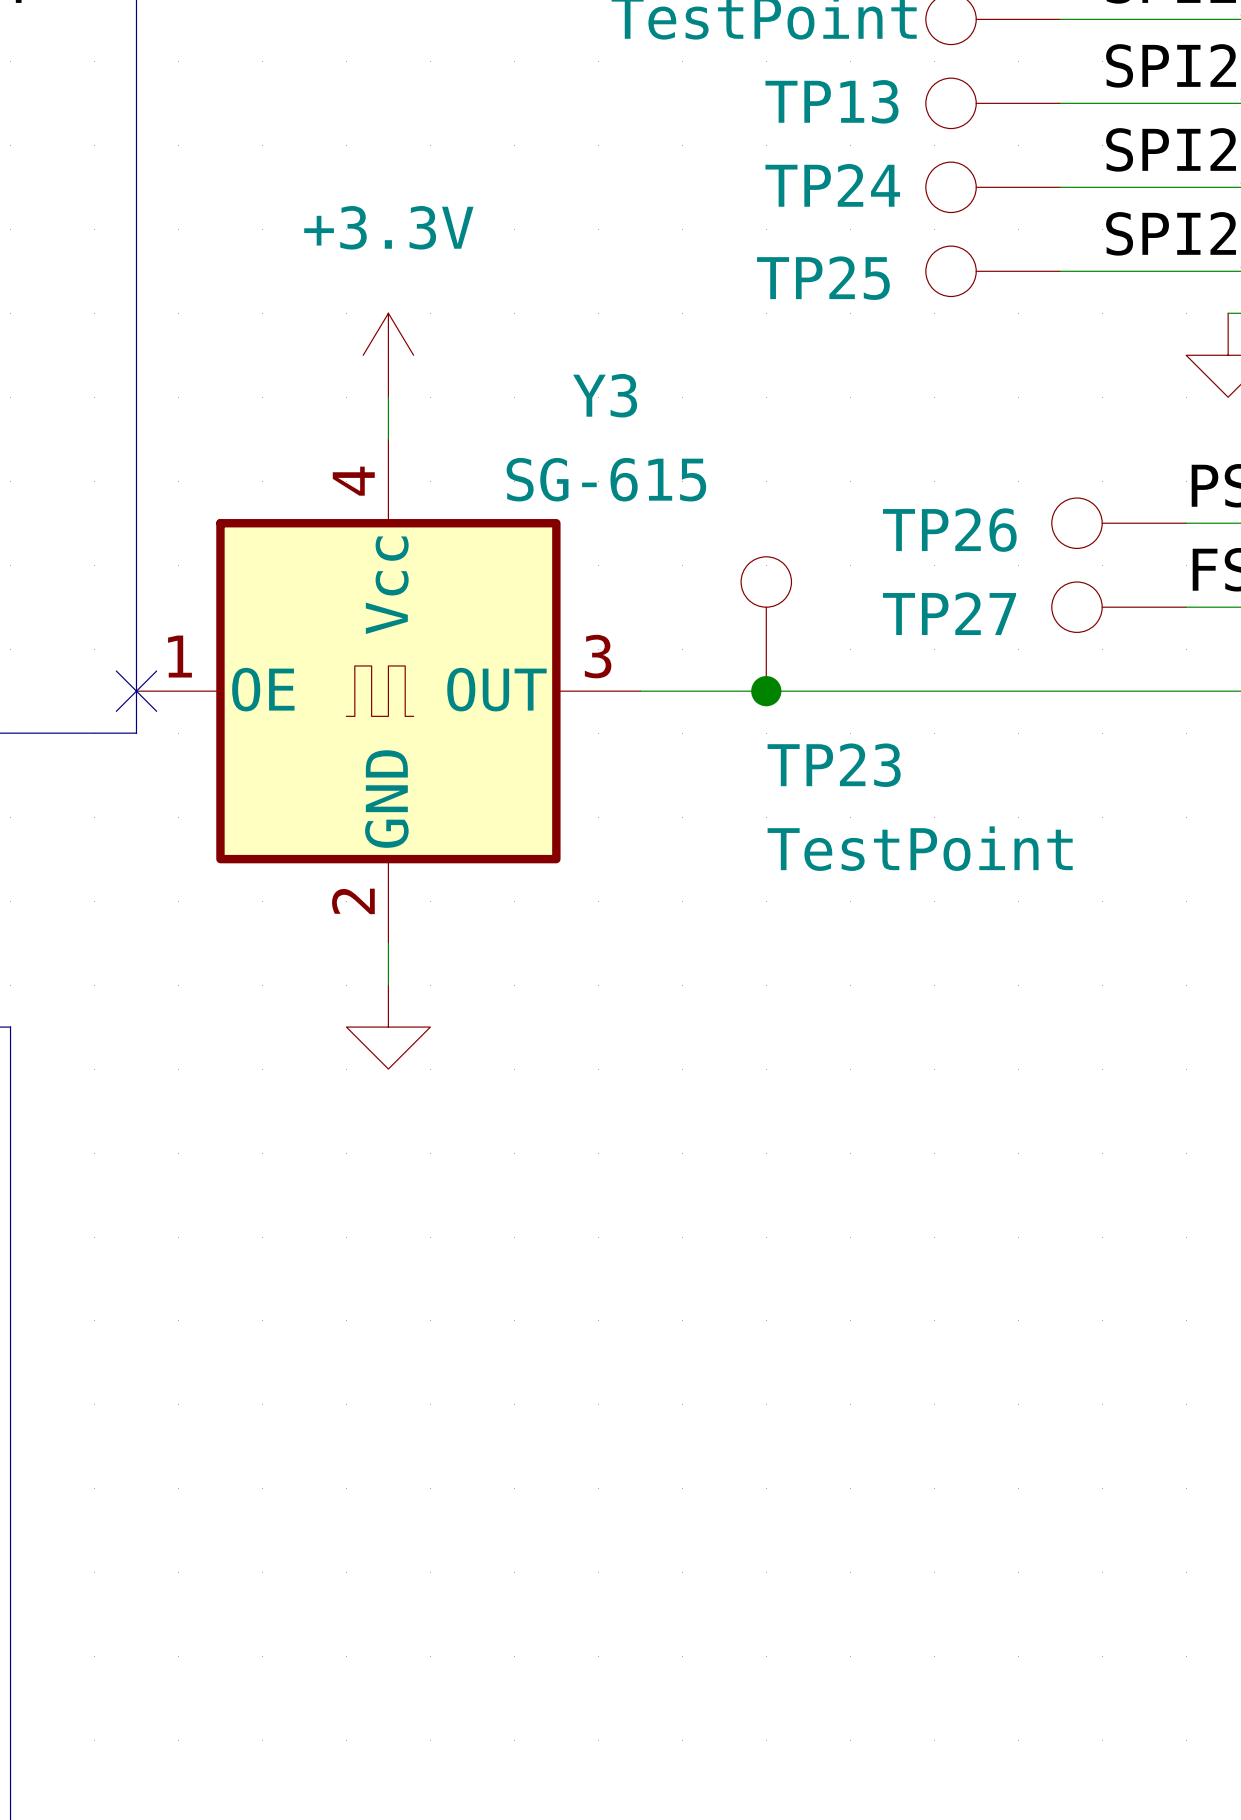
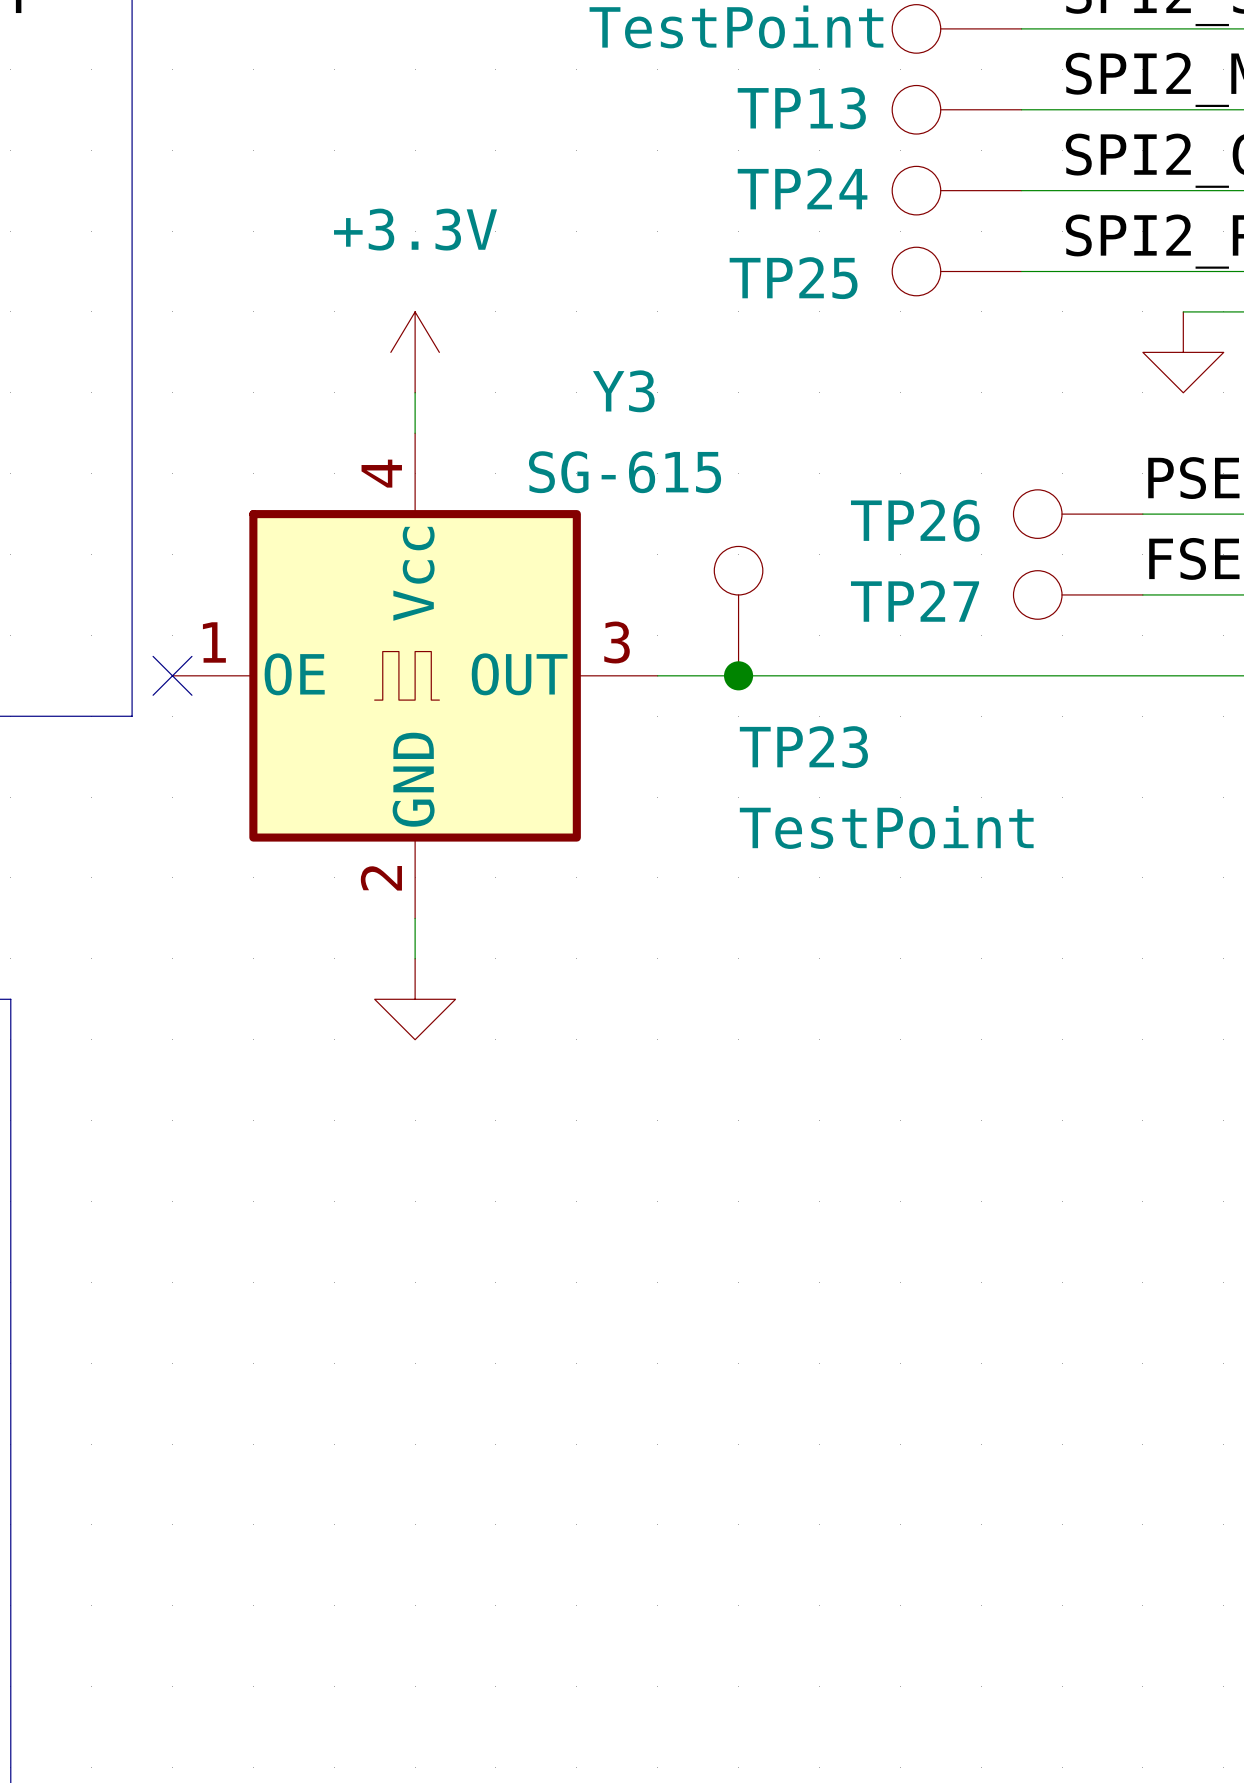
power symbol position: +3.3V (388, 355) -> +3.3V (415, 352)
wire: (388, 397) (388, 439) -> (415, 392) (415, 433)
no-connect mark position: (136, 691) -> (172, 675)
Y3 position: (388, 691) -> (415, 675)
wire: (388, 943) (388, 985) -> (415, 918) (415, 958)
power symbol position: (388, 1027) -> (415, 999)

